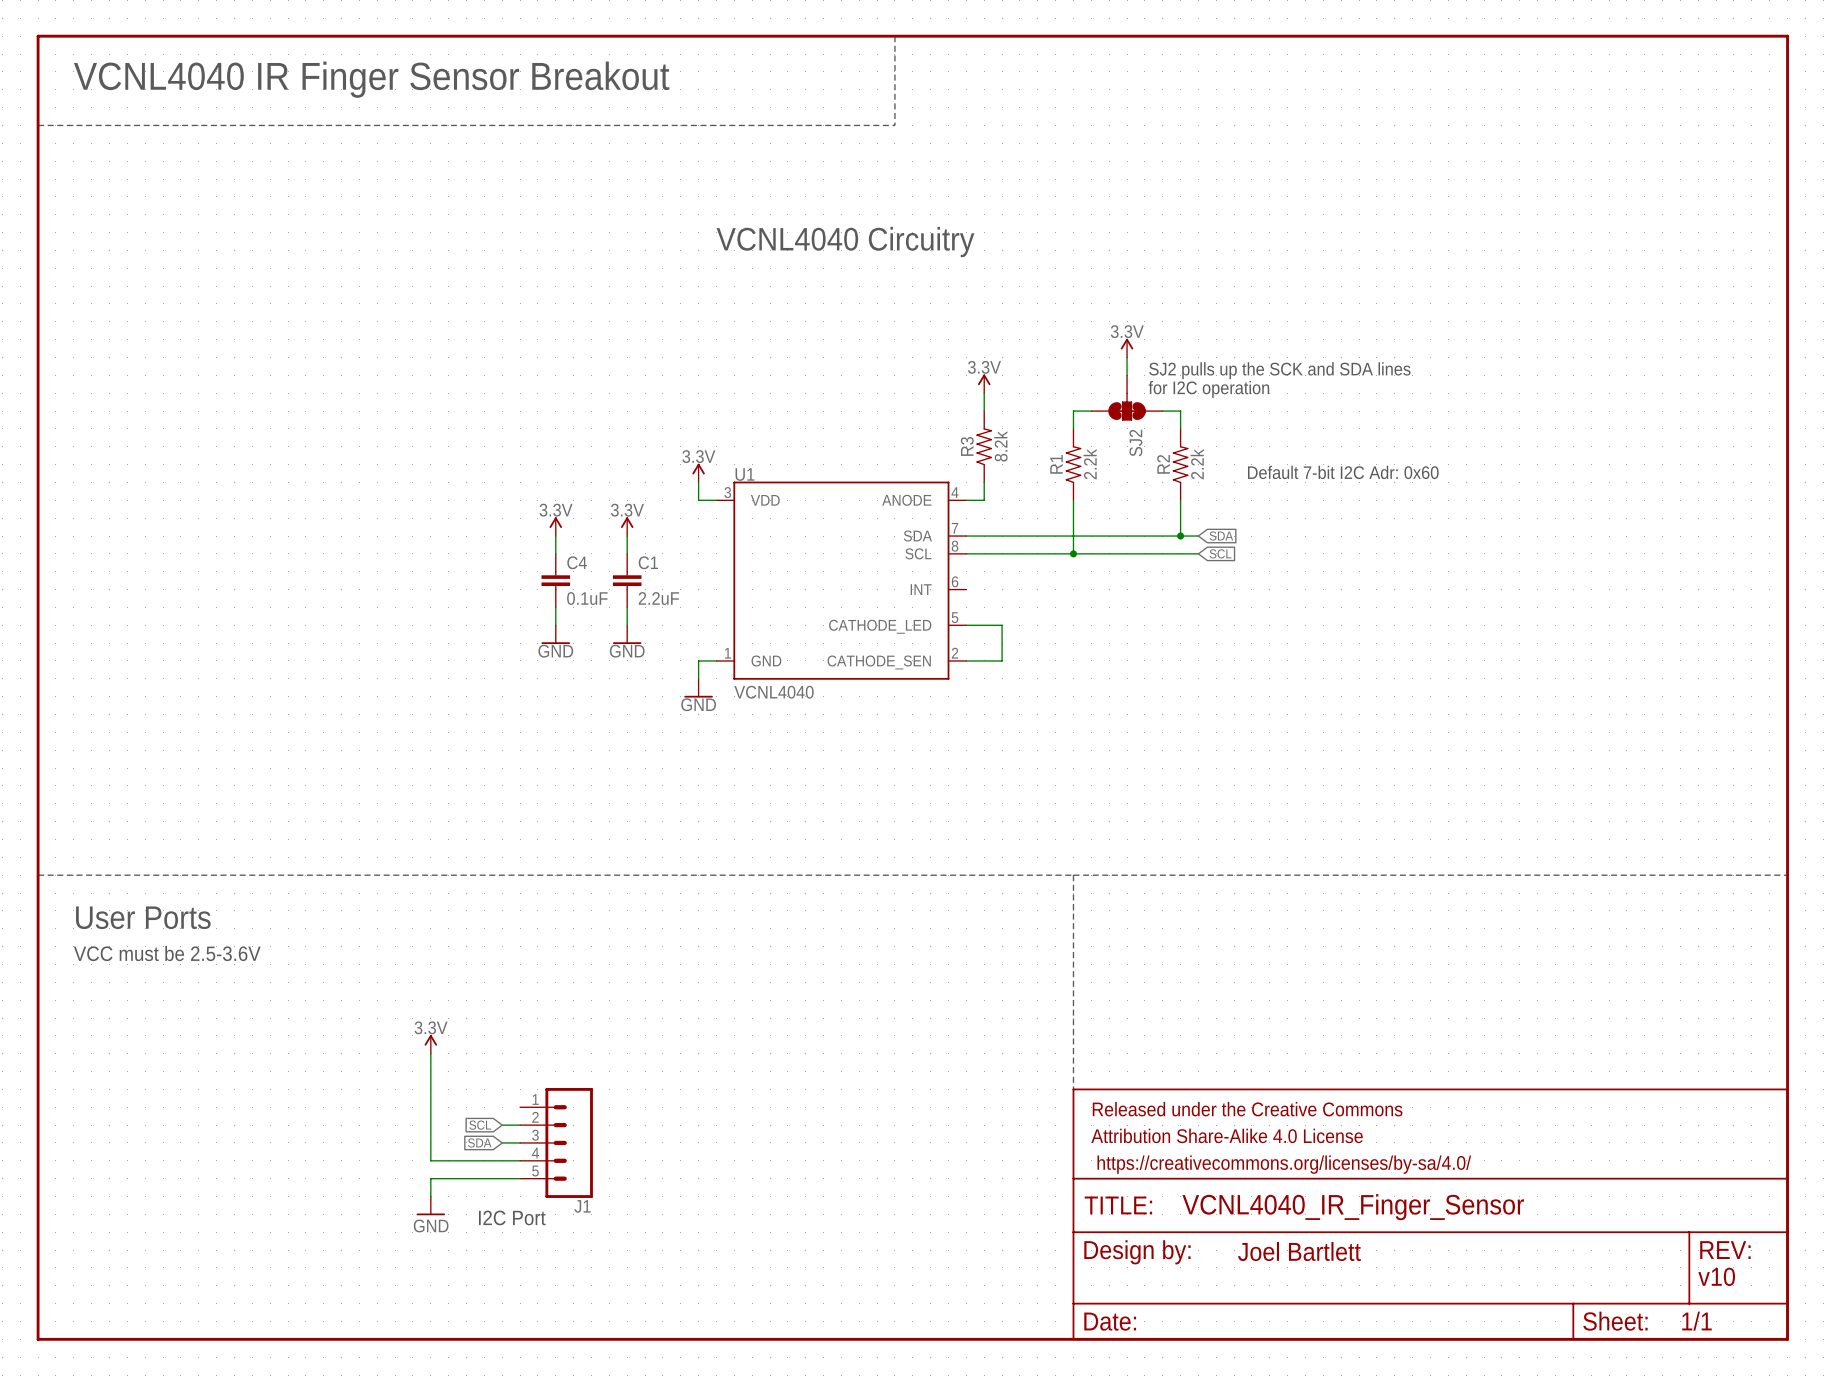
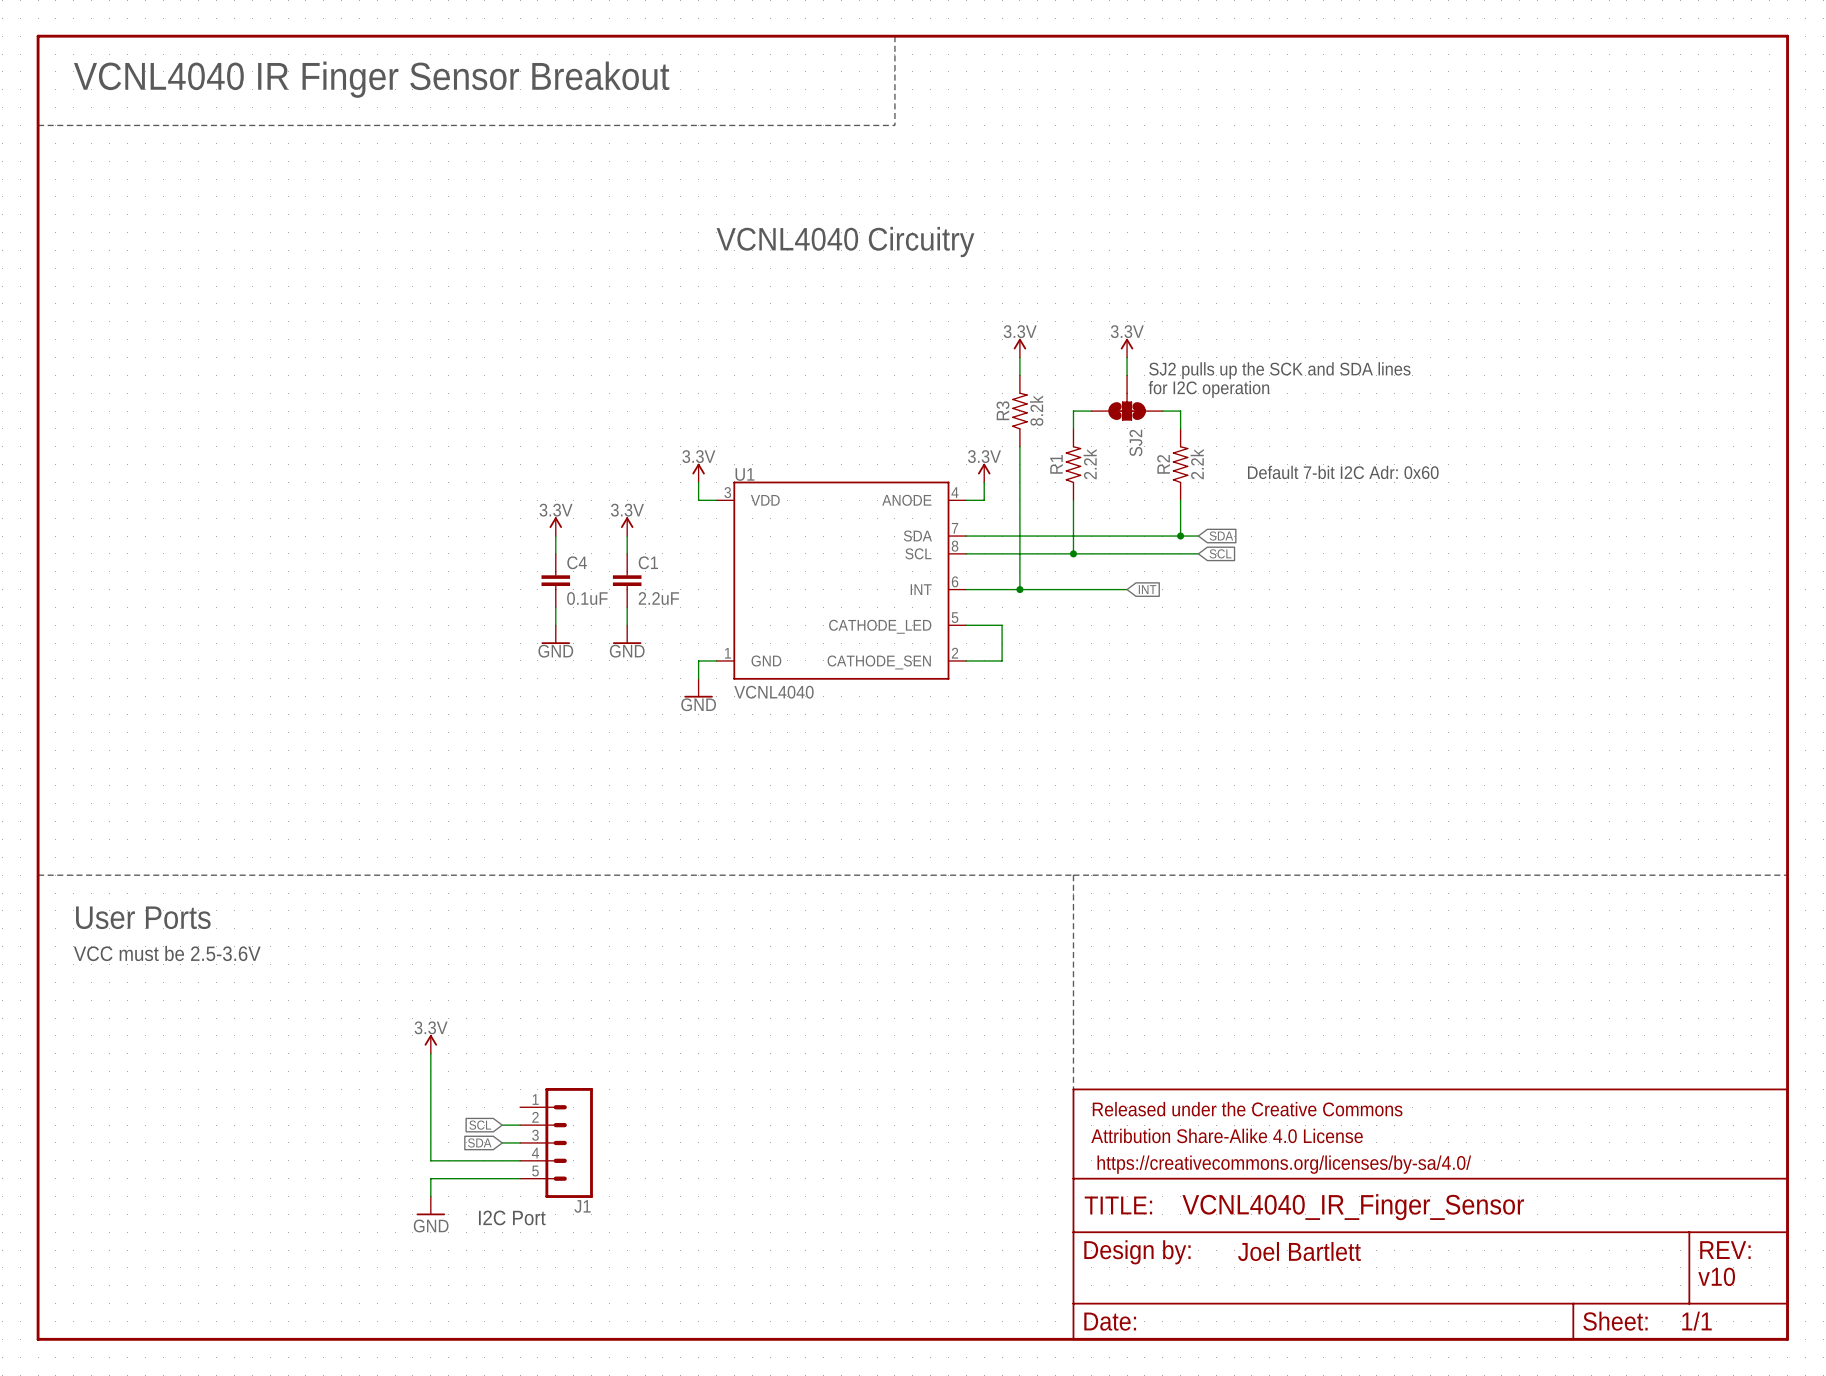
power symbol: none -> 3.3V (1019, 348)
power symbol: 3.3V (984, 383) -> none
wire: (984, 393) (984, 411) -> (1019, 357) (1019, 375)
R3 position: (984, 446) -> (1019, 411)
wire: none -> (1019, 446) (1019, 589)
power symbol: none -> 3.3V (984, 473)
wire: none -> (966, 589) (1127, 589)
junction: none -> (1019, 589)
global label: none -> INT (1147, 589)

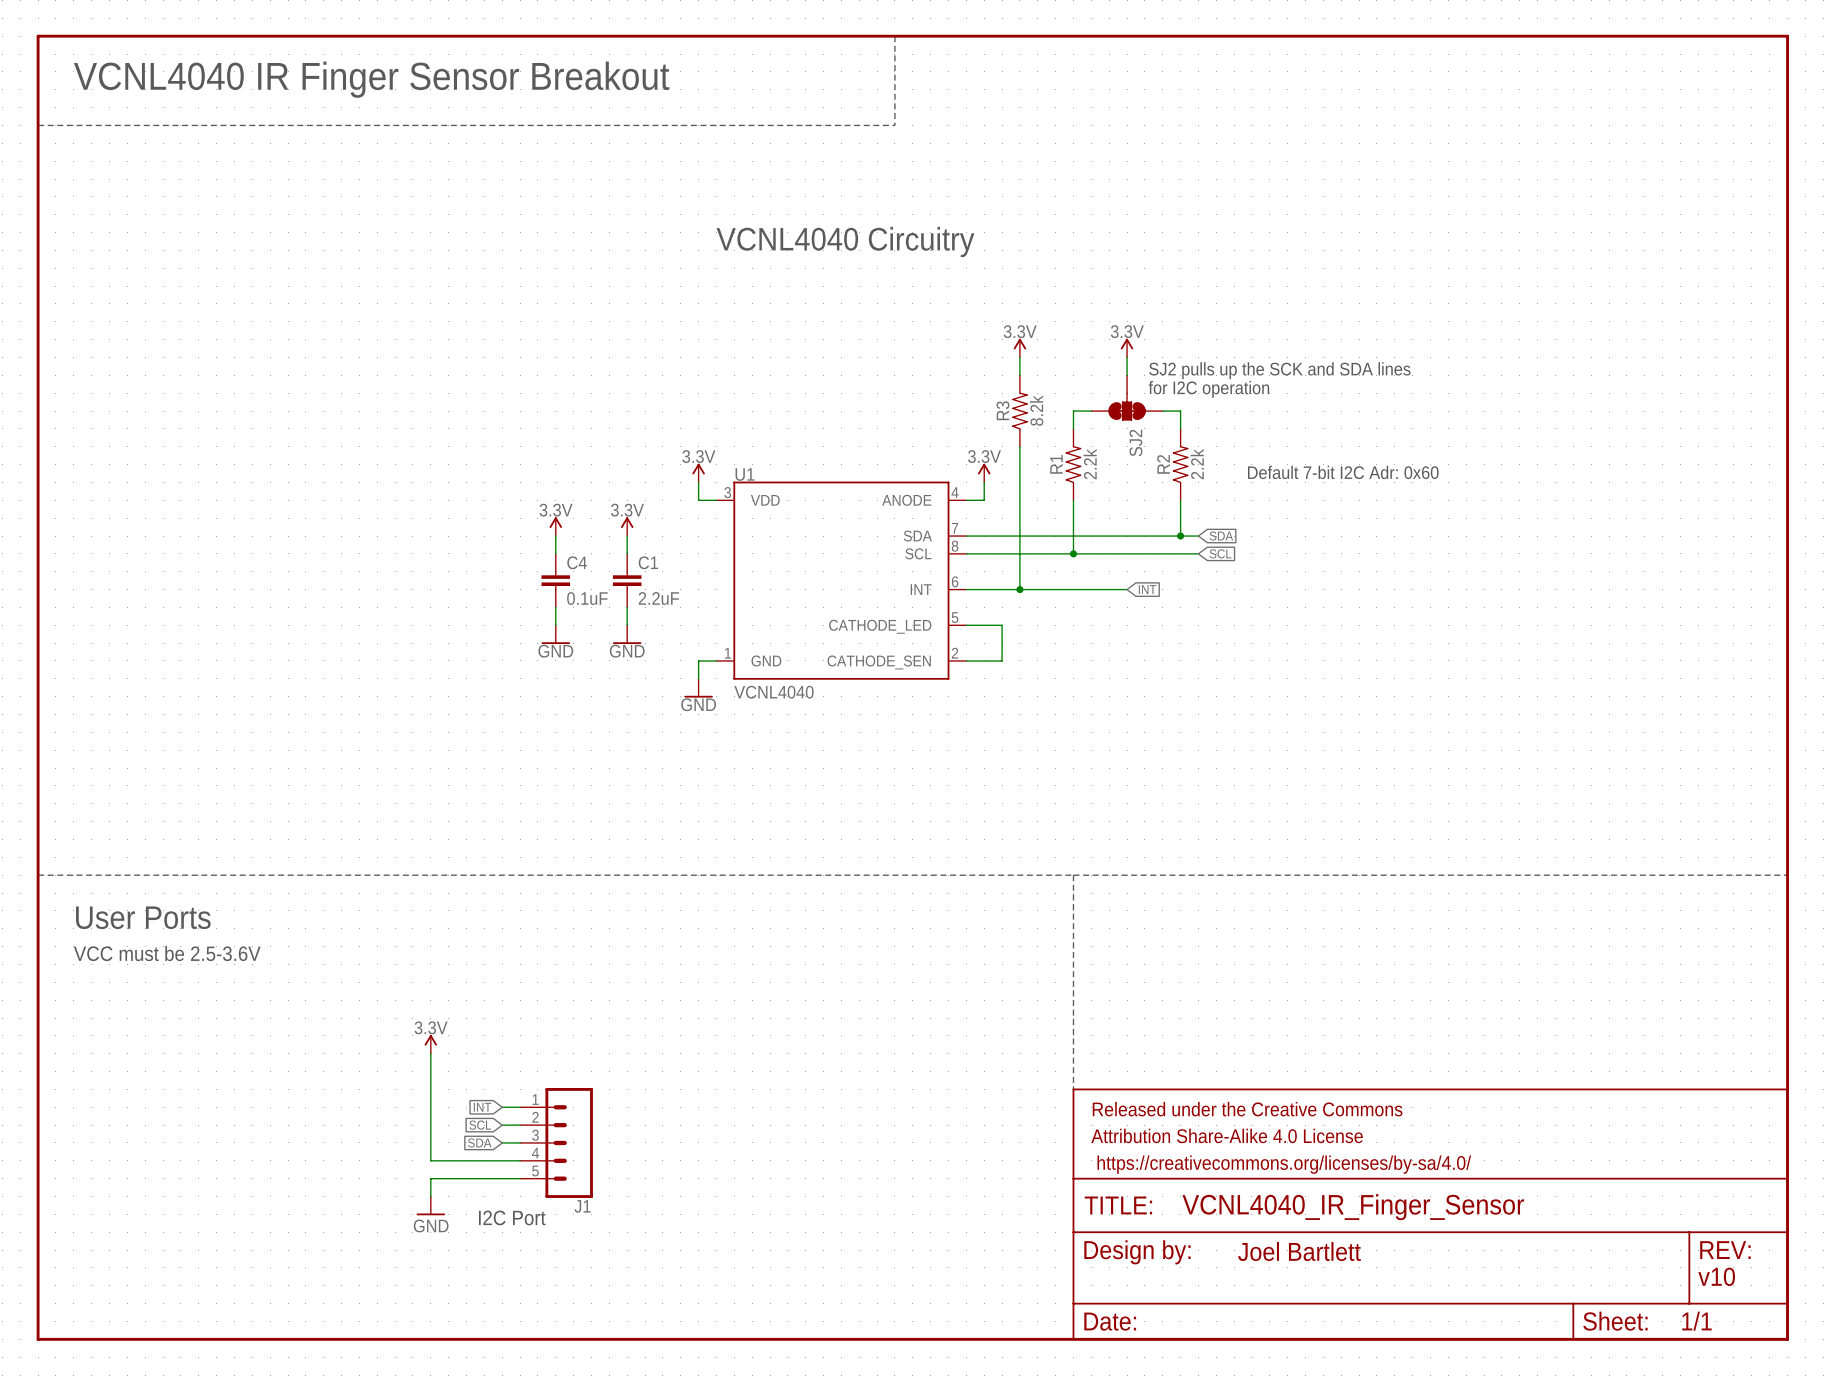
global label: none -> INT (482, 1107)
wire: none -> (502, 1107) (520, 1107)

